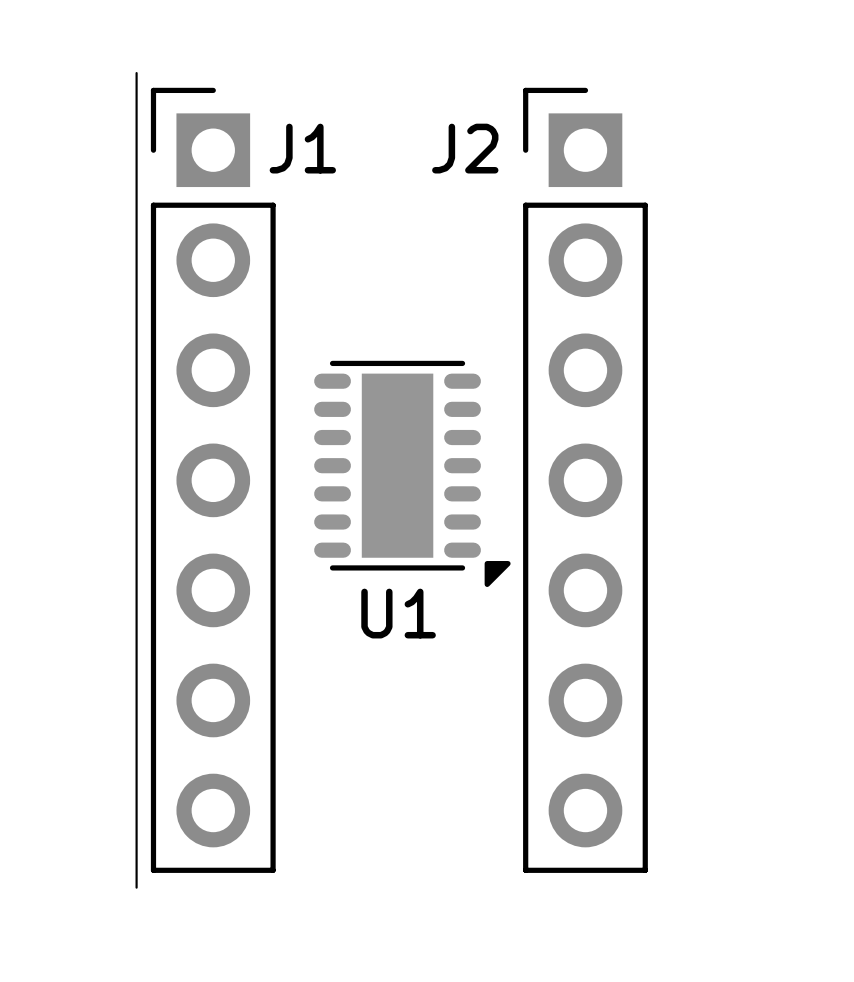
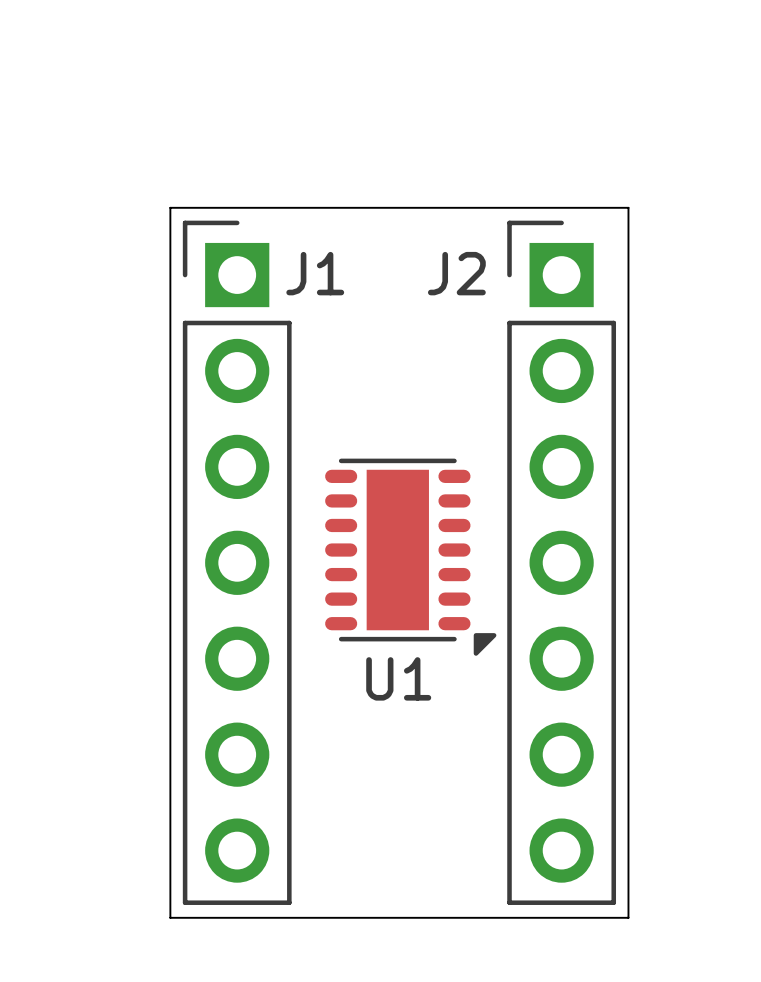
board edge: none -> (170, 207) (628, 207) (628, 917) (170, 917)

